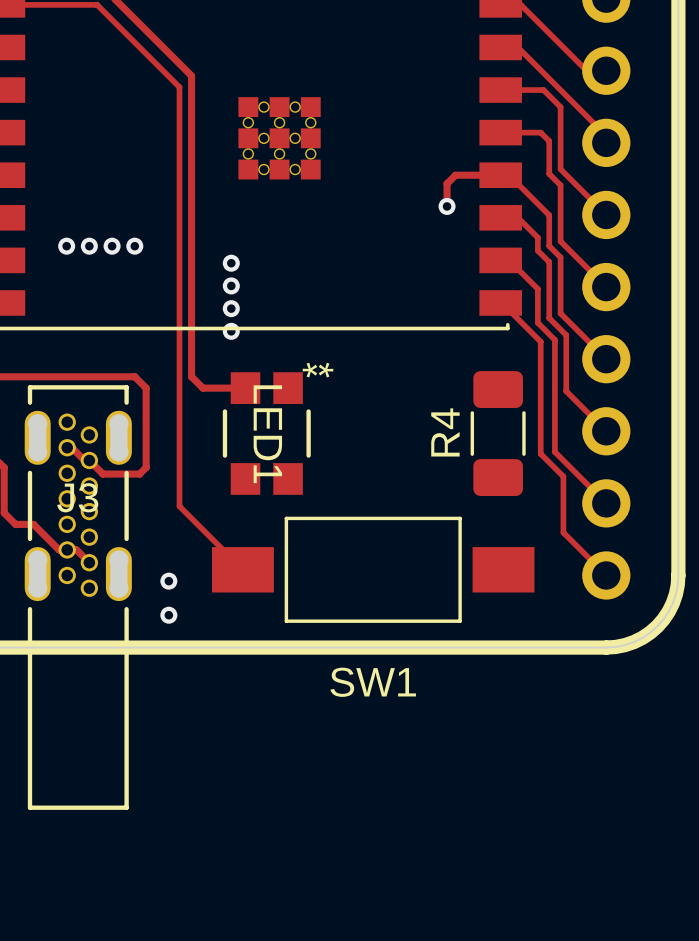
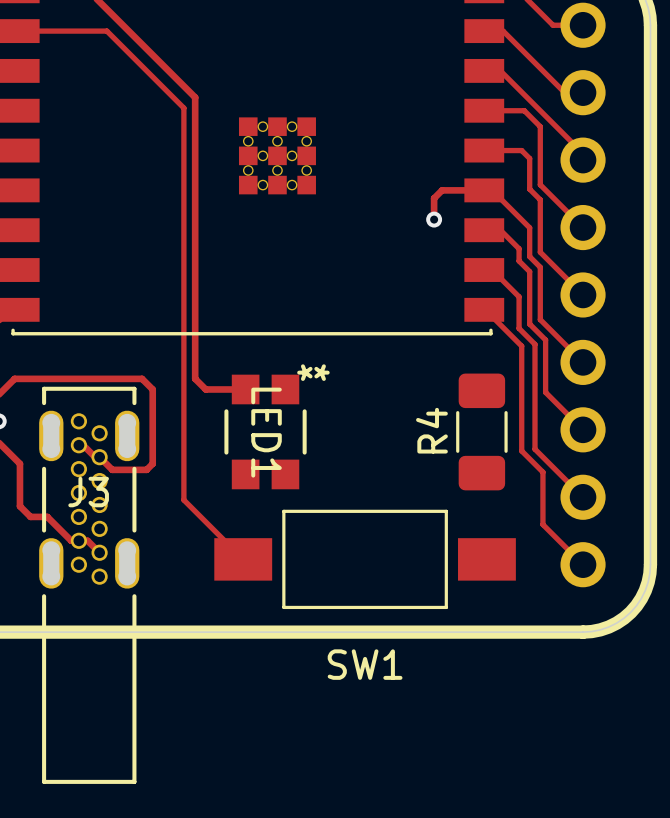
via: (66, 246) -> none
via: (89, 246) -> none
via: (112, 246) -> none
via: (134, 246) -> none
via: (231, 263) -> none
via: (231, 285) -> none
via: (231, 308) -> none
via: (231, 331) -> none
via: (168, 581) -> none
via: (168, 615) -> none

